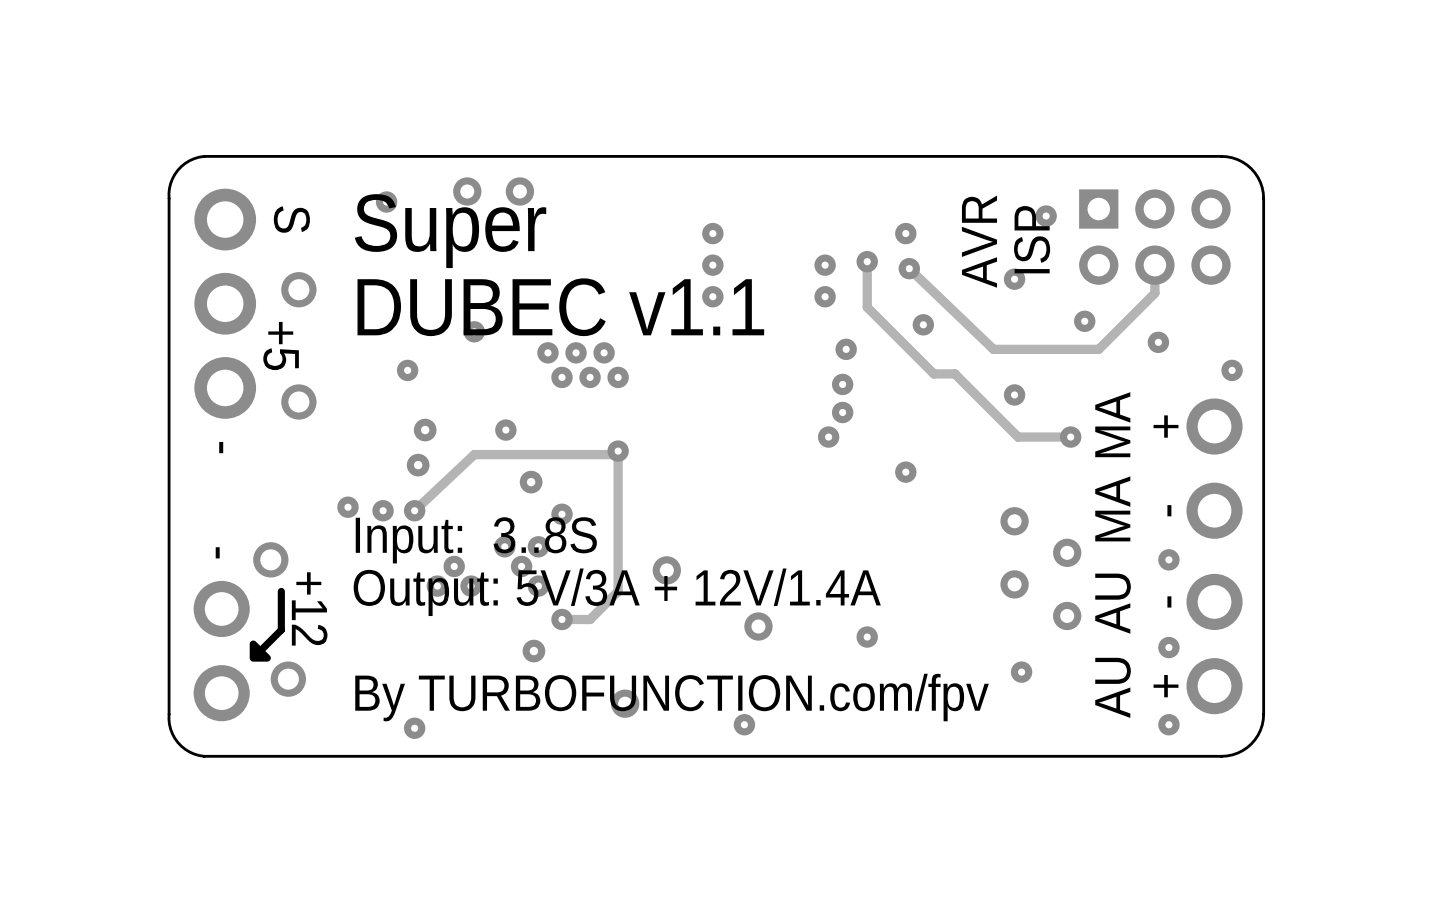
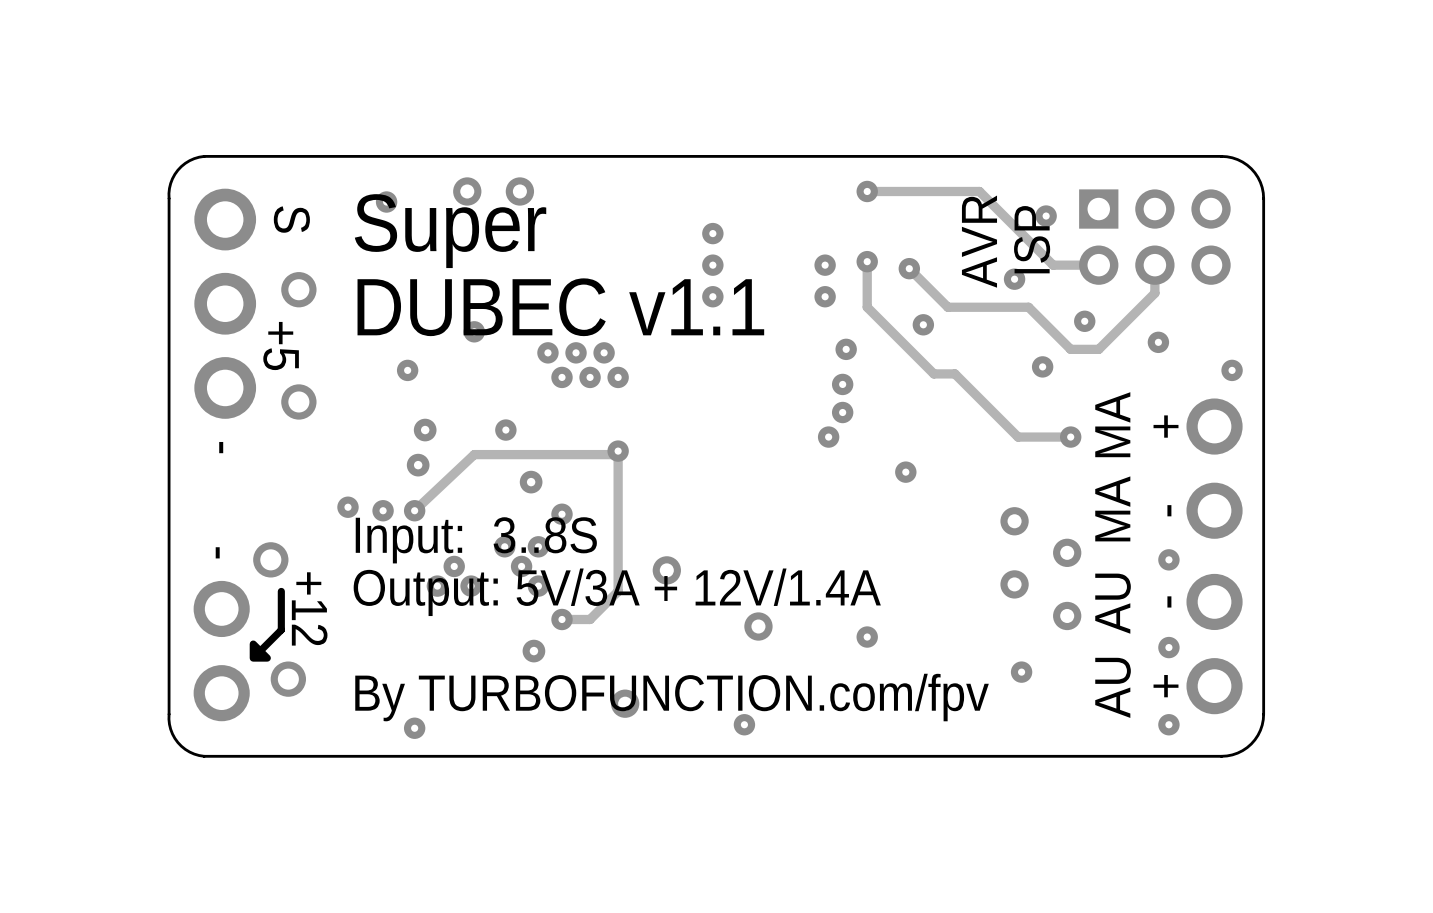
track: none -> (867, 191) (979, 191) (1053, 265) (1098, 265)
via position: (905, 233) -> (867, 191)
track: (909, 268) (993, 349) (1070, 349) -> (909, 268) (947, 307) (1028, 307) (1070, 349)
via position: (1014, 394) -> (1042, 366)

